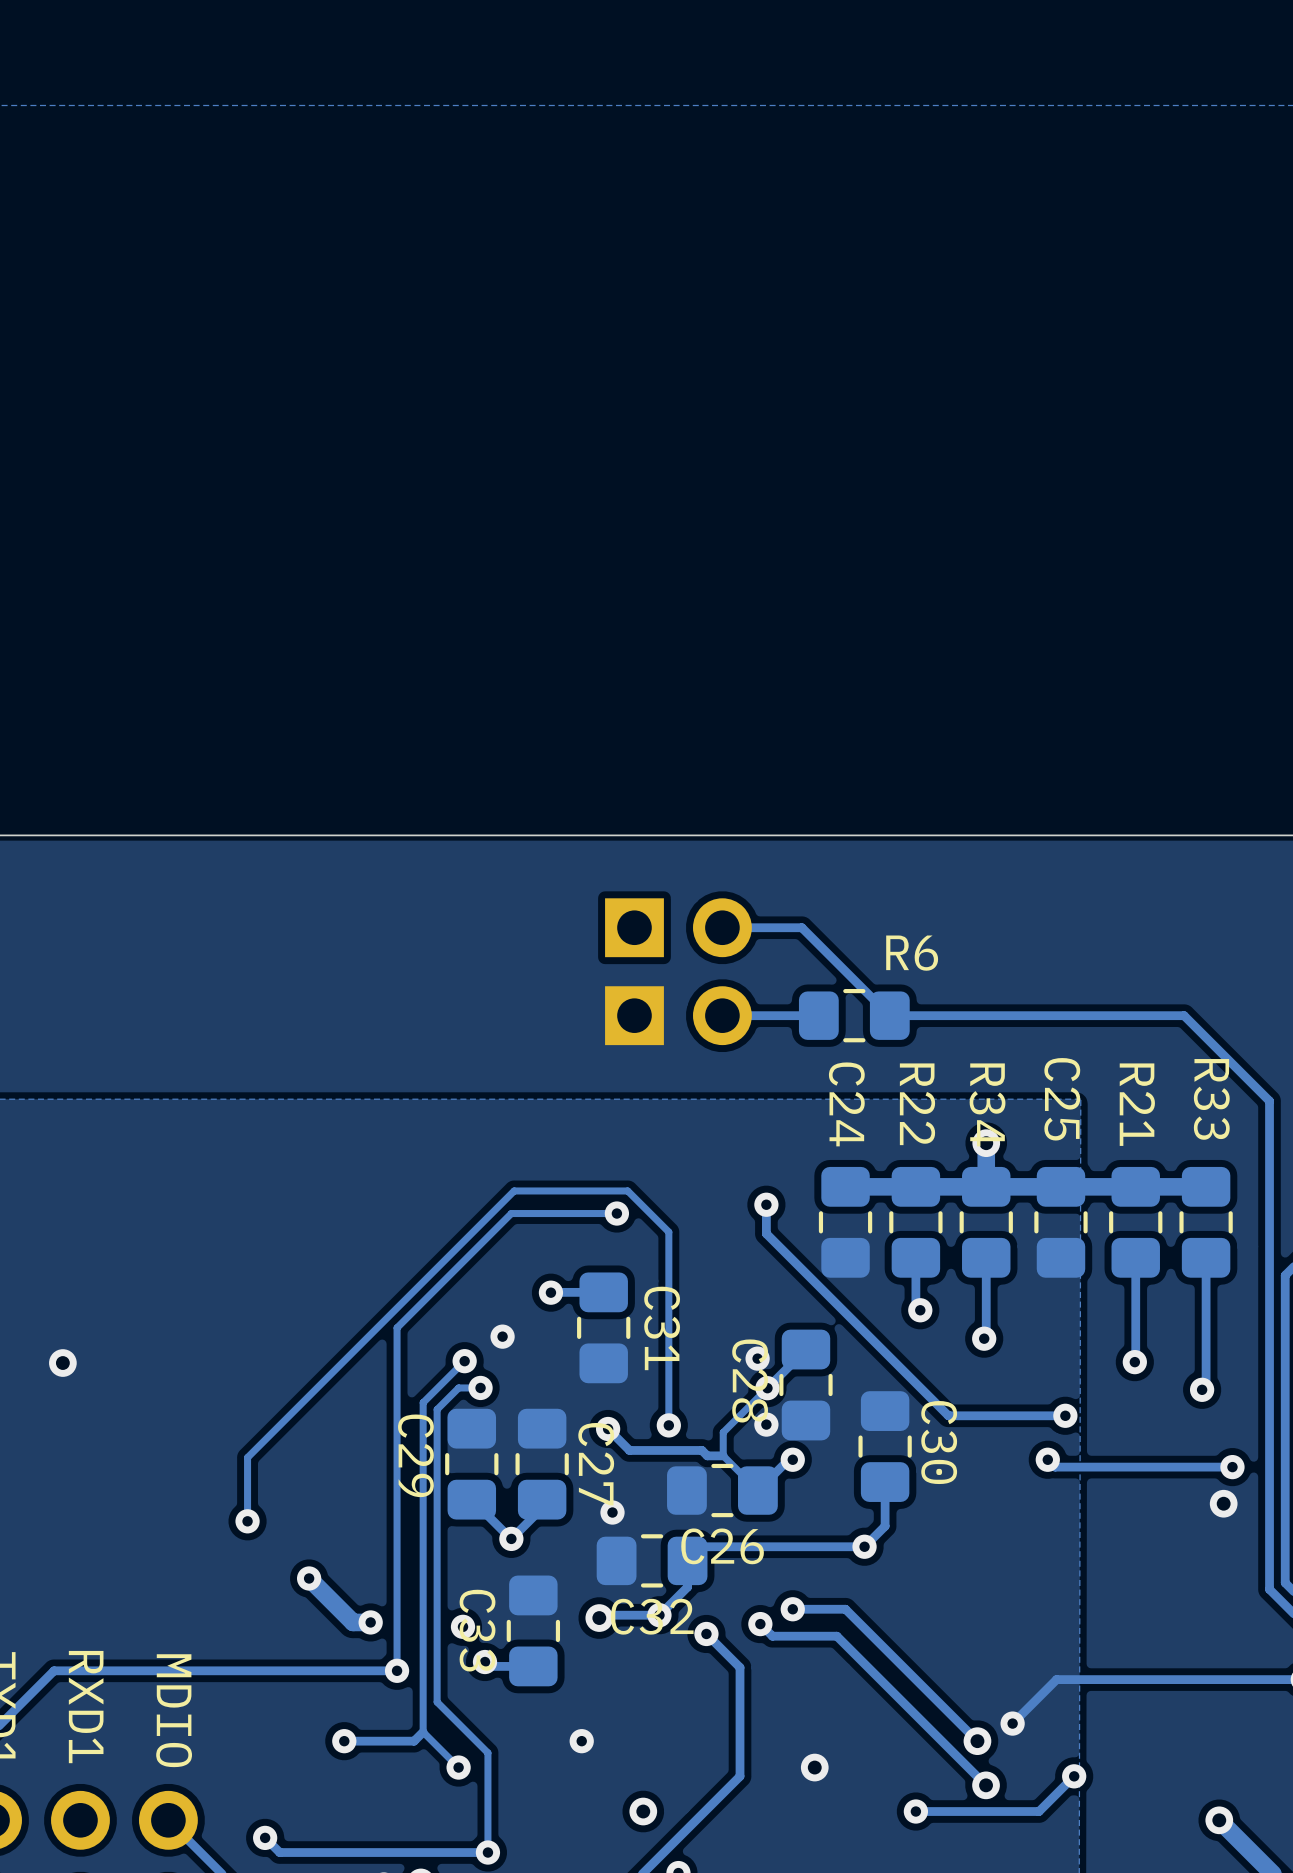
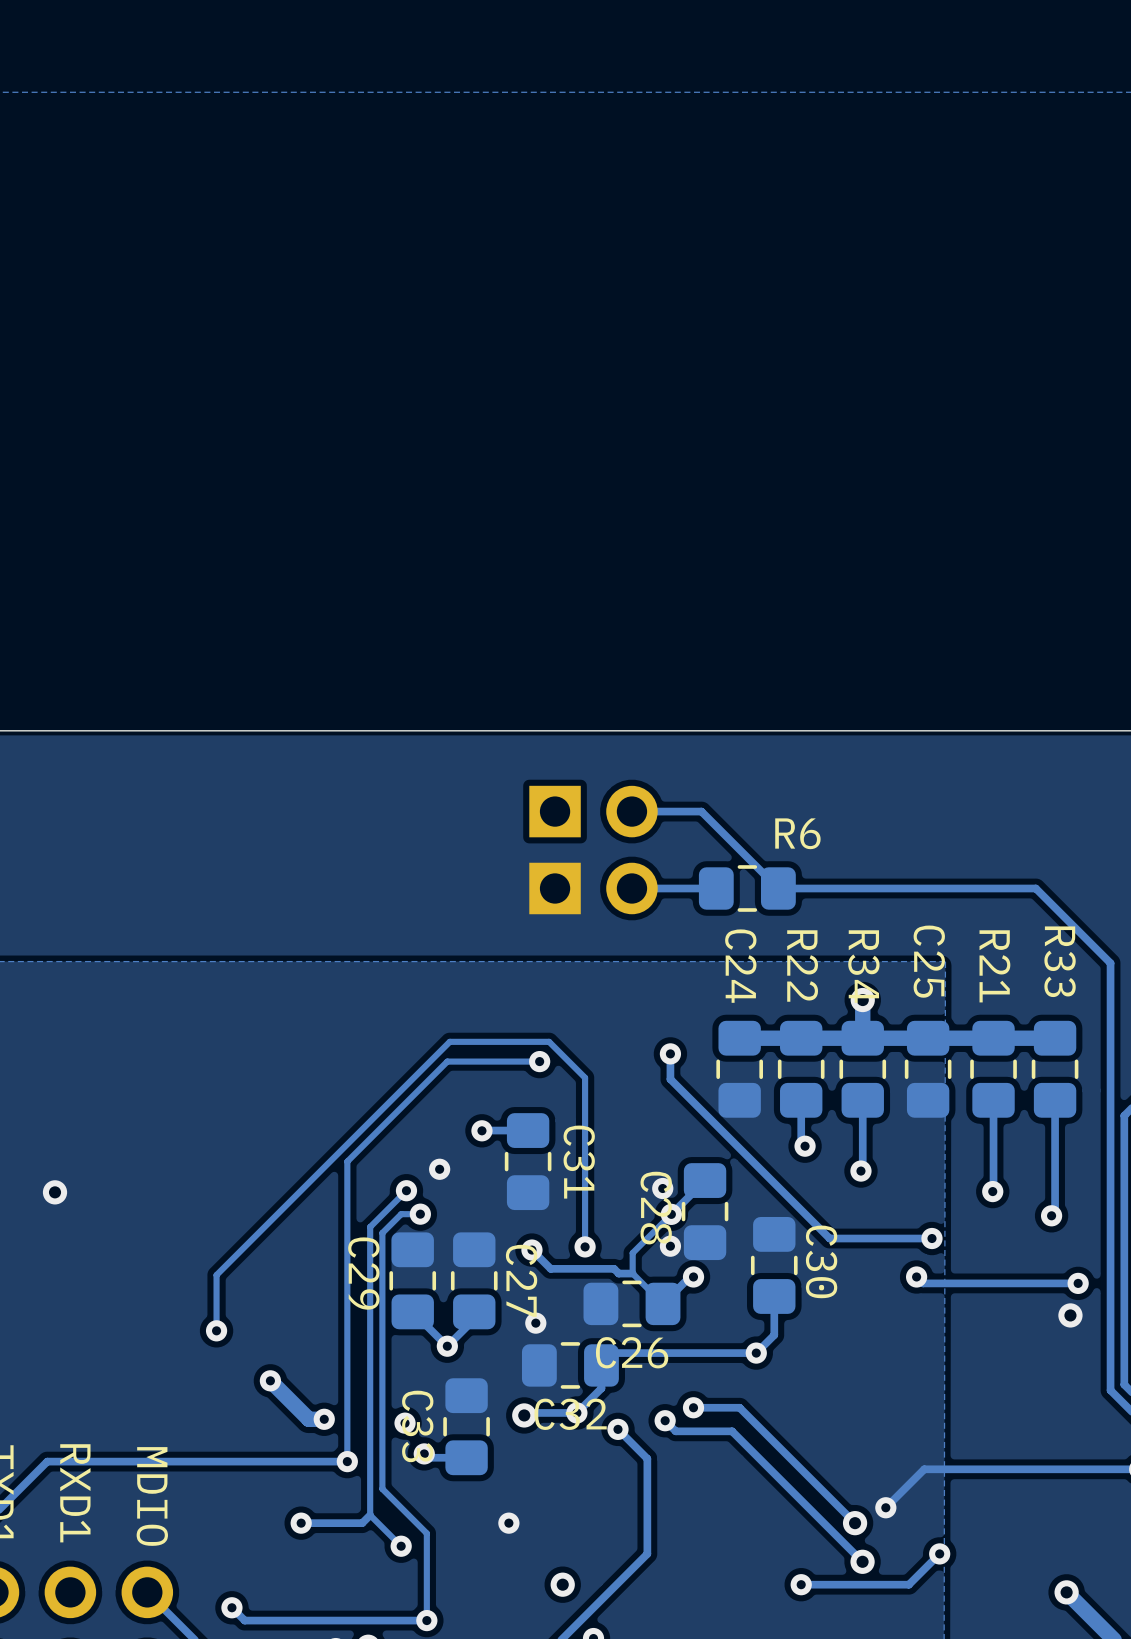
via: (814, 1767) -> none

